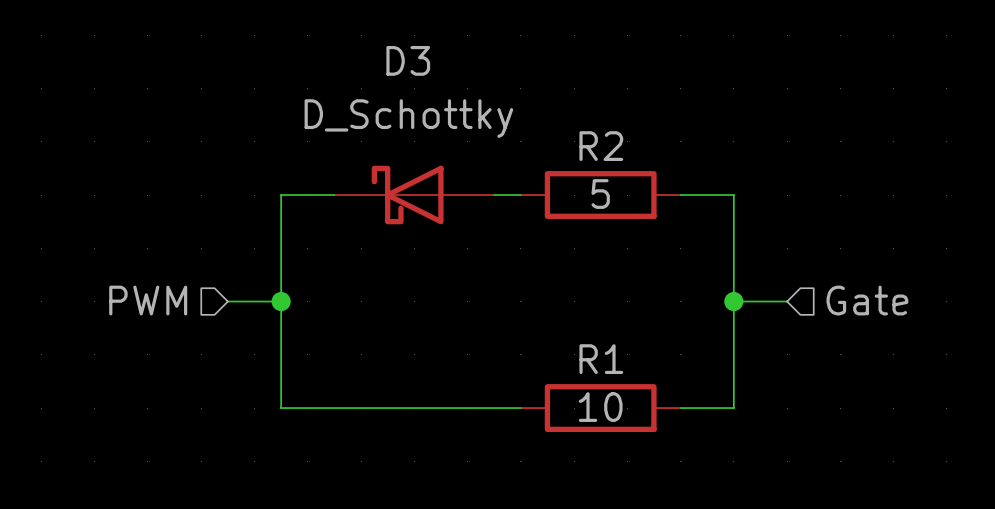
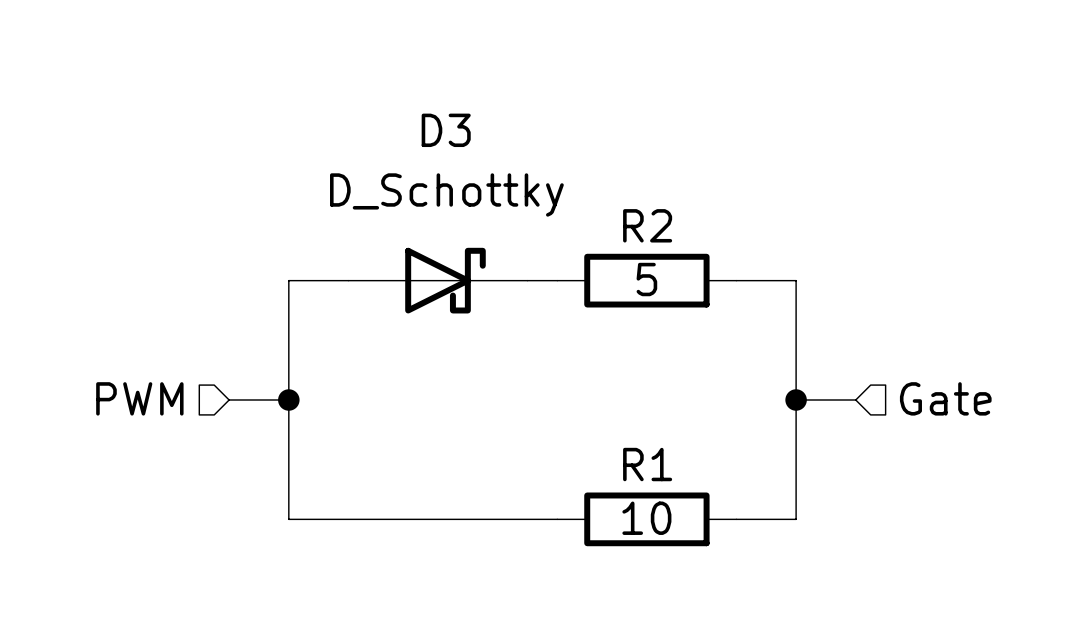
D3 flip: as is (407, 195) -> left-right (445, 280)

